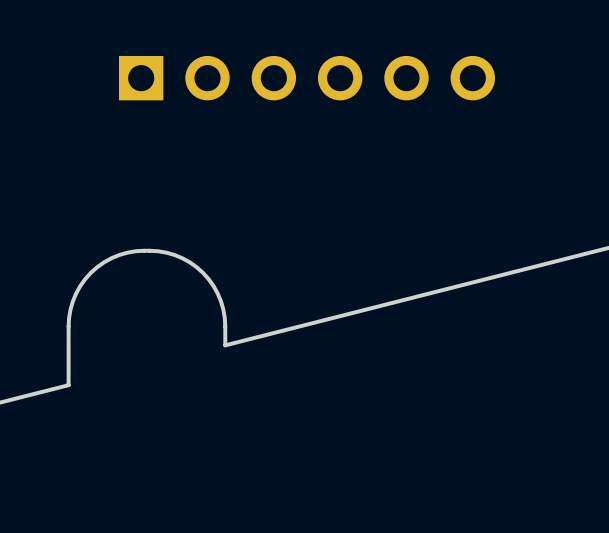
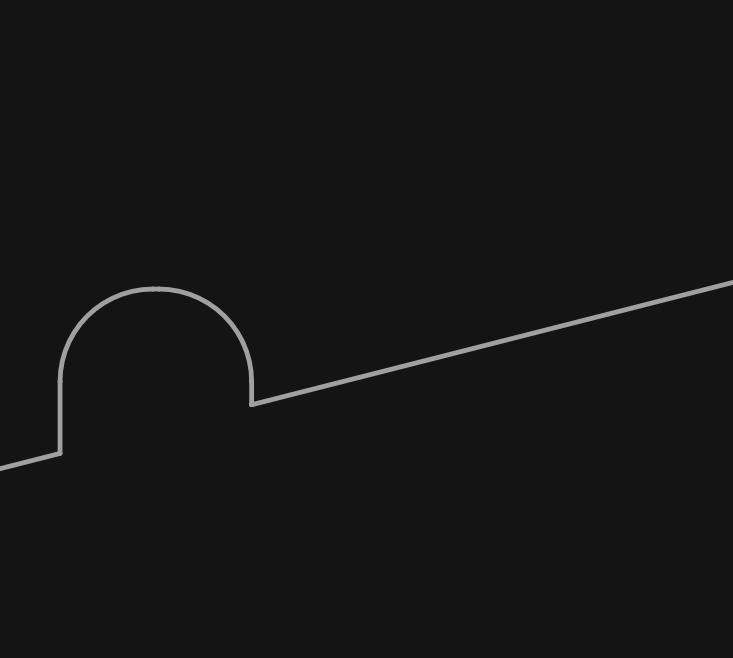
part: (307, 78) -> none

